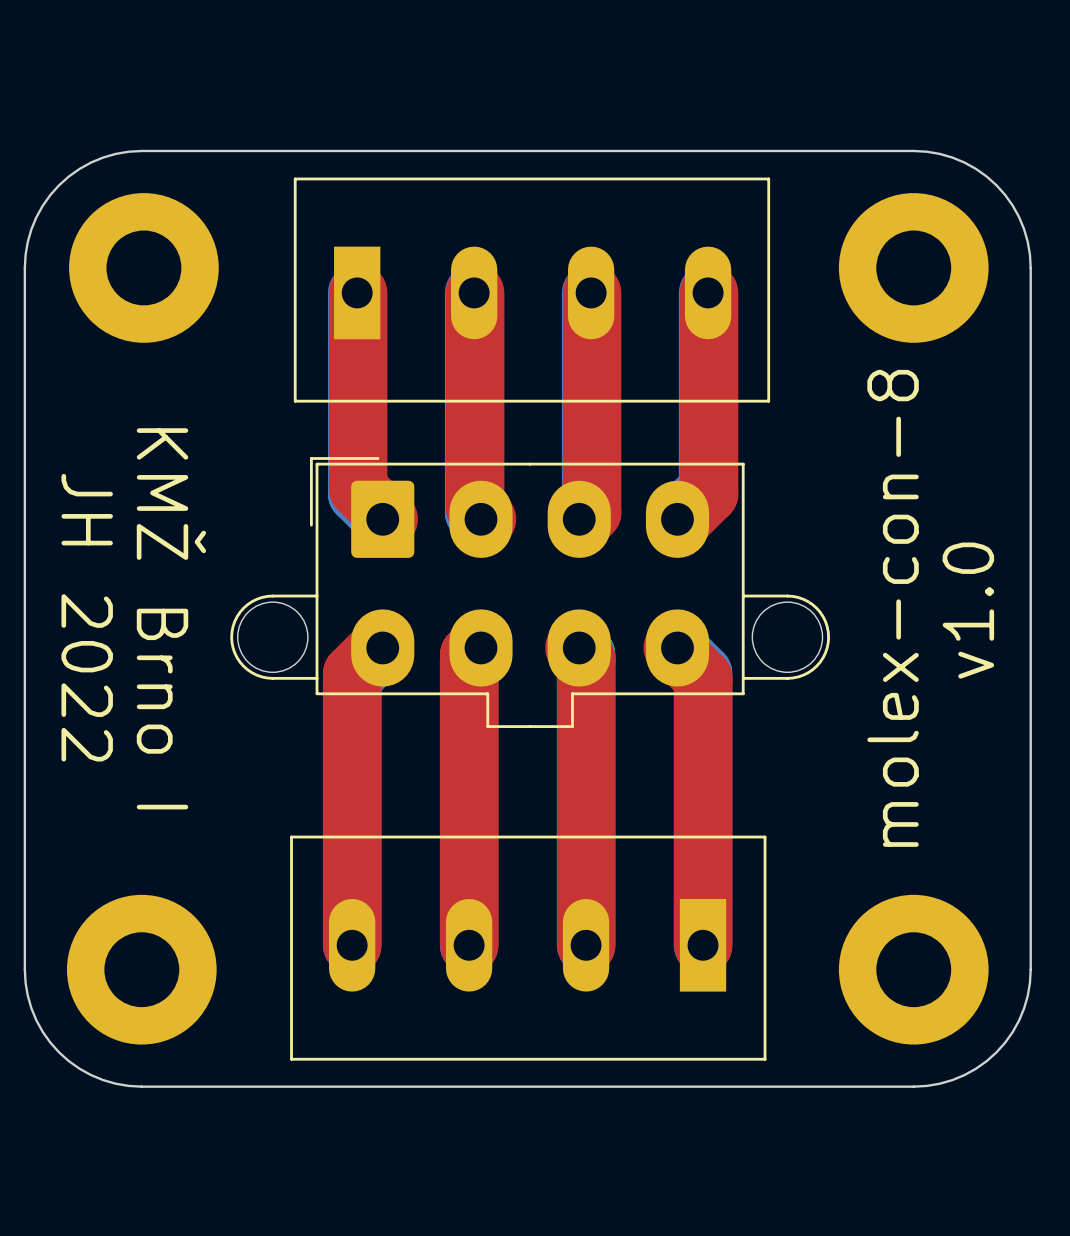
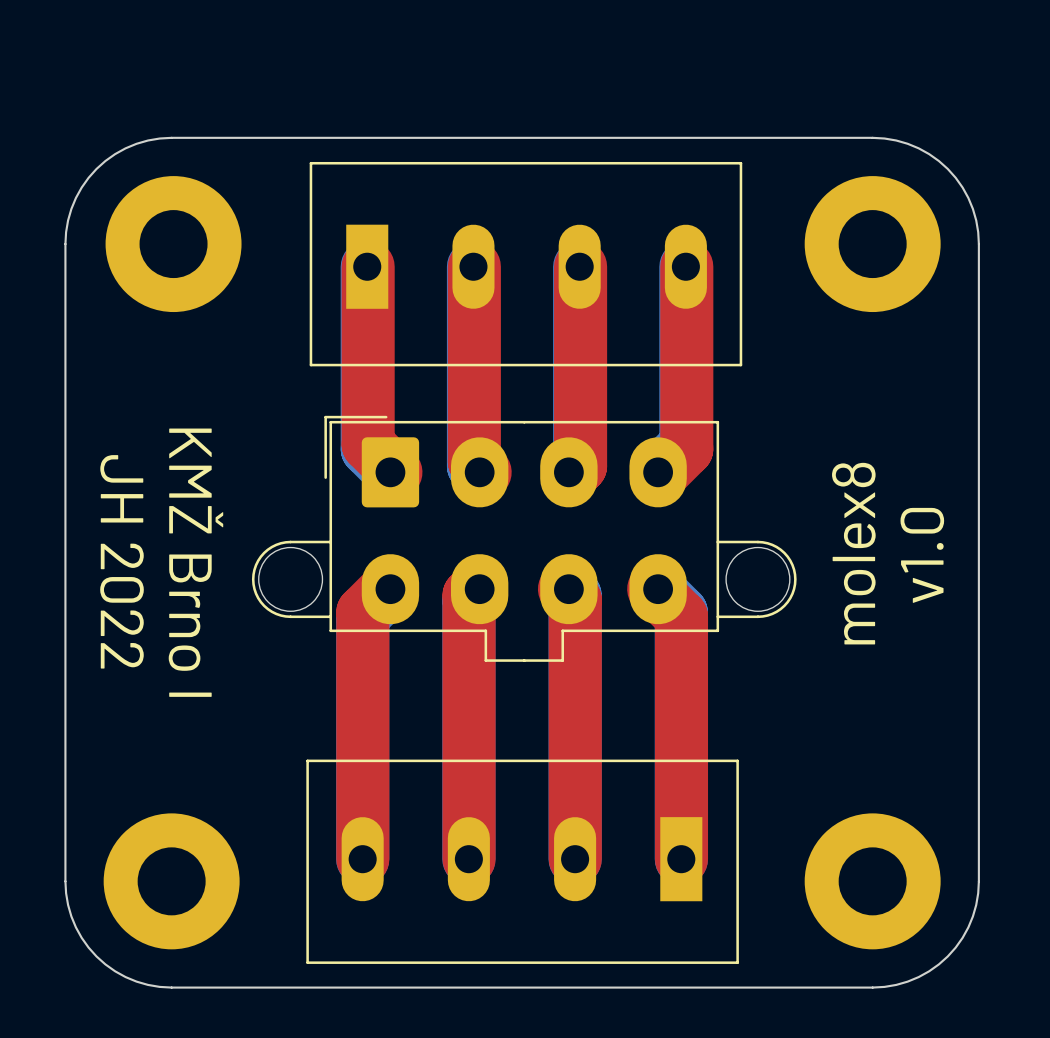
text: molex-con-8 (893, 608) -> molex8 (853, 553)

